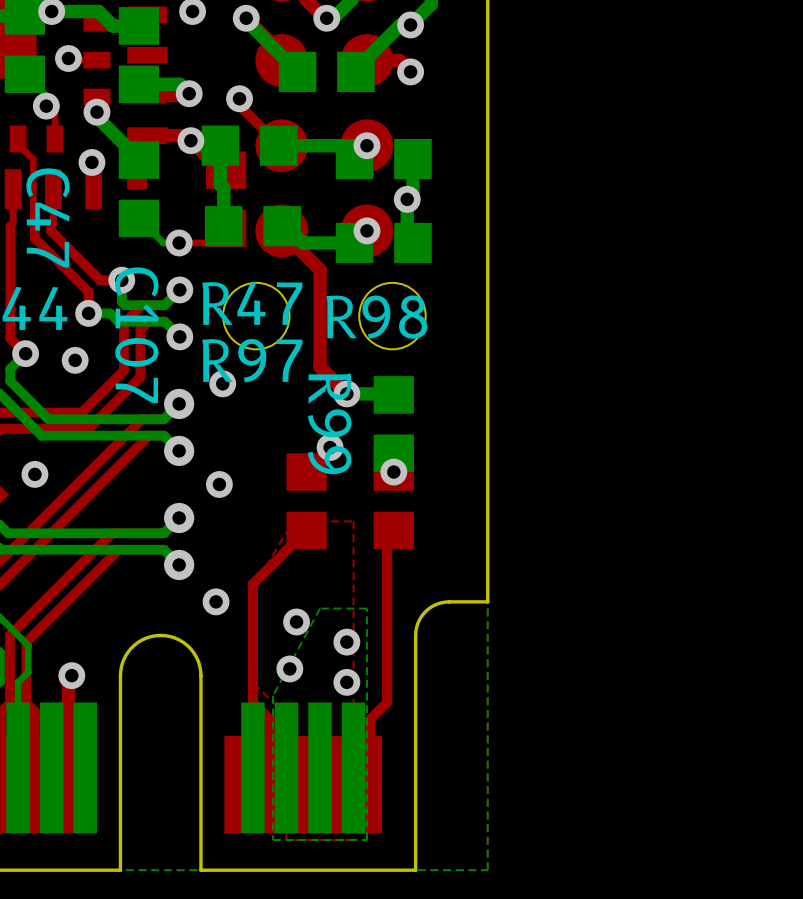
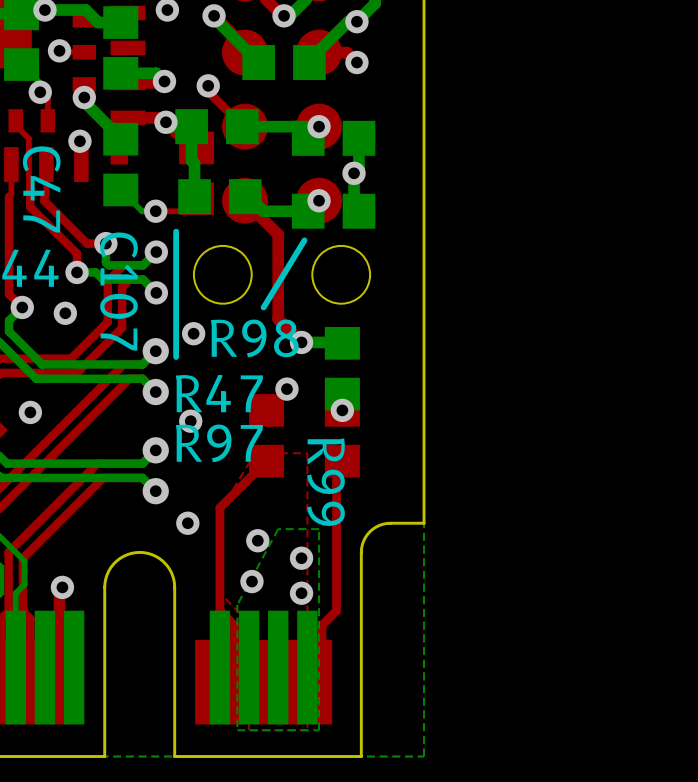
line: none -> (176, 231) (176, 357)
line: none -> (304, 240) (263, 307)
R47 name position: R47 (252, 303) -> R47 (219, 393)
R98 name position: R98 (376, 317) -> R98 (254, 338)
R97 name position: R97 (252, 360) -> R97 (219, 443)
R99 name position: R99 (329, 423) -> R99 (326, 482)

